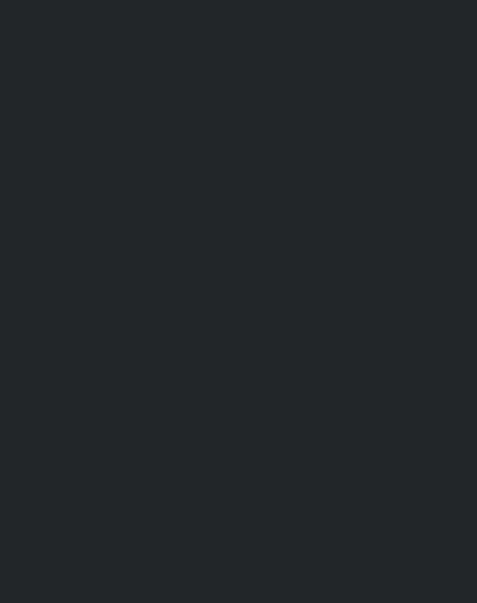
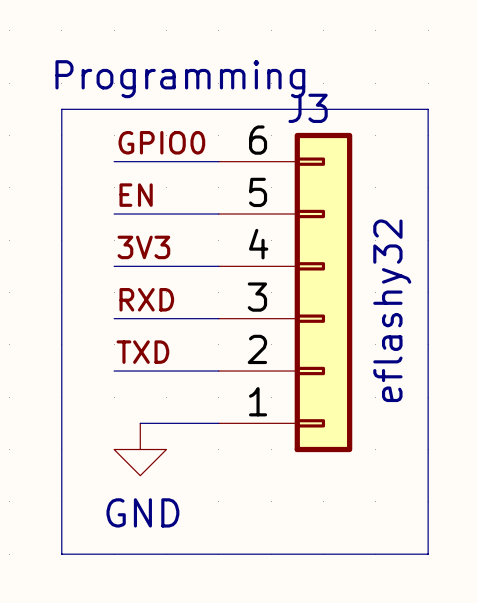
text: none -> Programming (180, 79)
line: none -> (61, 109) (61, 554) (428, 554) (428, 109) (61, 109)
label: none -> GPIO0 (161, 142)
wire: none -> (114, 161) (218, 161)
label: none -> EN (136, 195)
wire: none -> (114, 214) (218, 214)
label: none -> 3V3 (143, 247)
wire: none -> (114, 266) (218, 266)
J3: none -> eflashy32 (285, 292)
label: none -> RXD (146, 299)
wire: none -> (114, 318) (218, 318)
label: none -> TXD (142, 352)
wire: none -> (114, 371) (218, 371)
wire: none -> (140, 423) (218, 423)
power symbol: none -> GND (140, 449)

